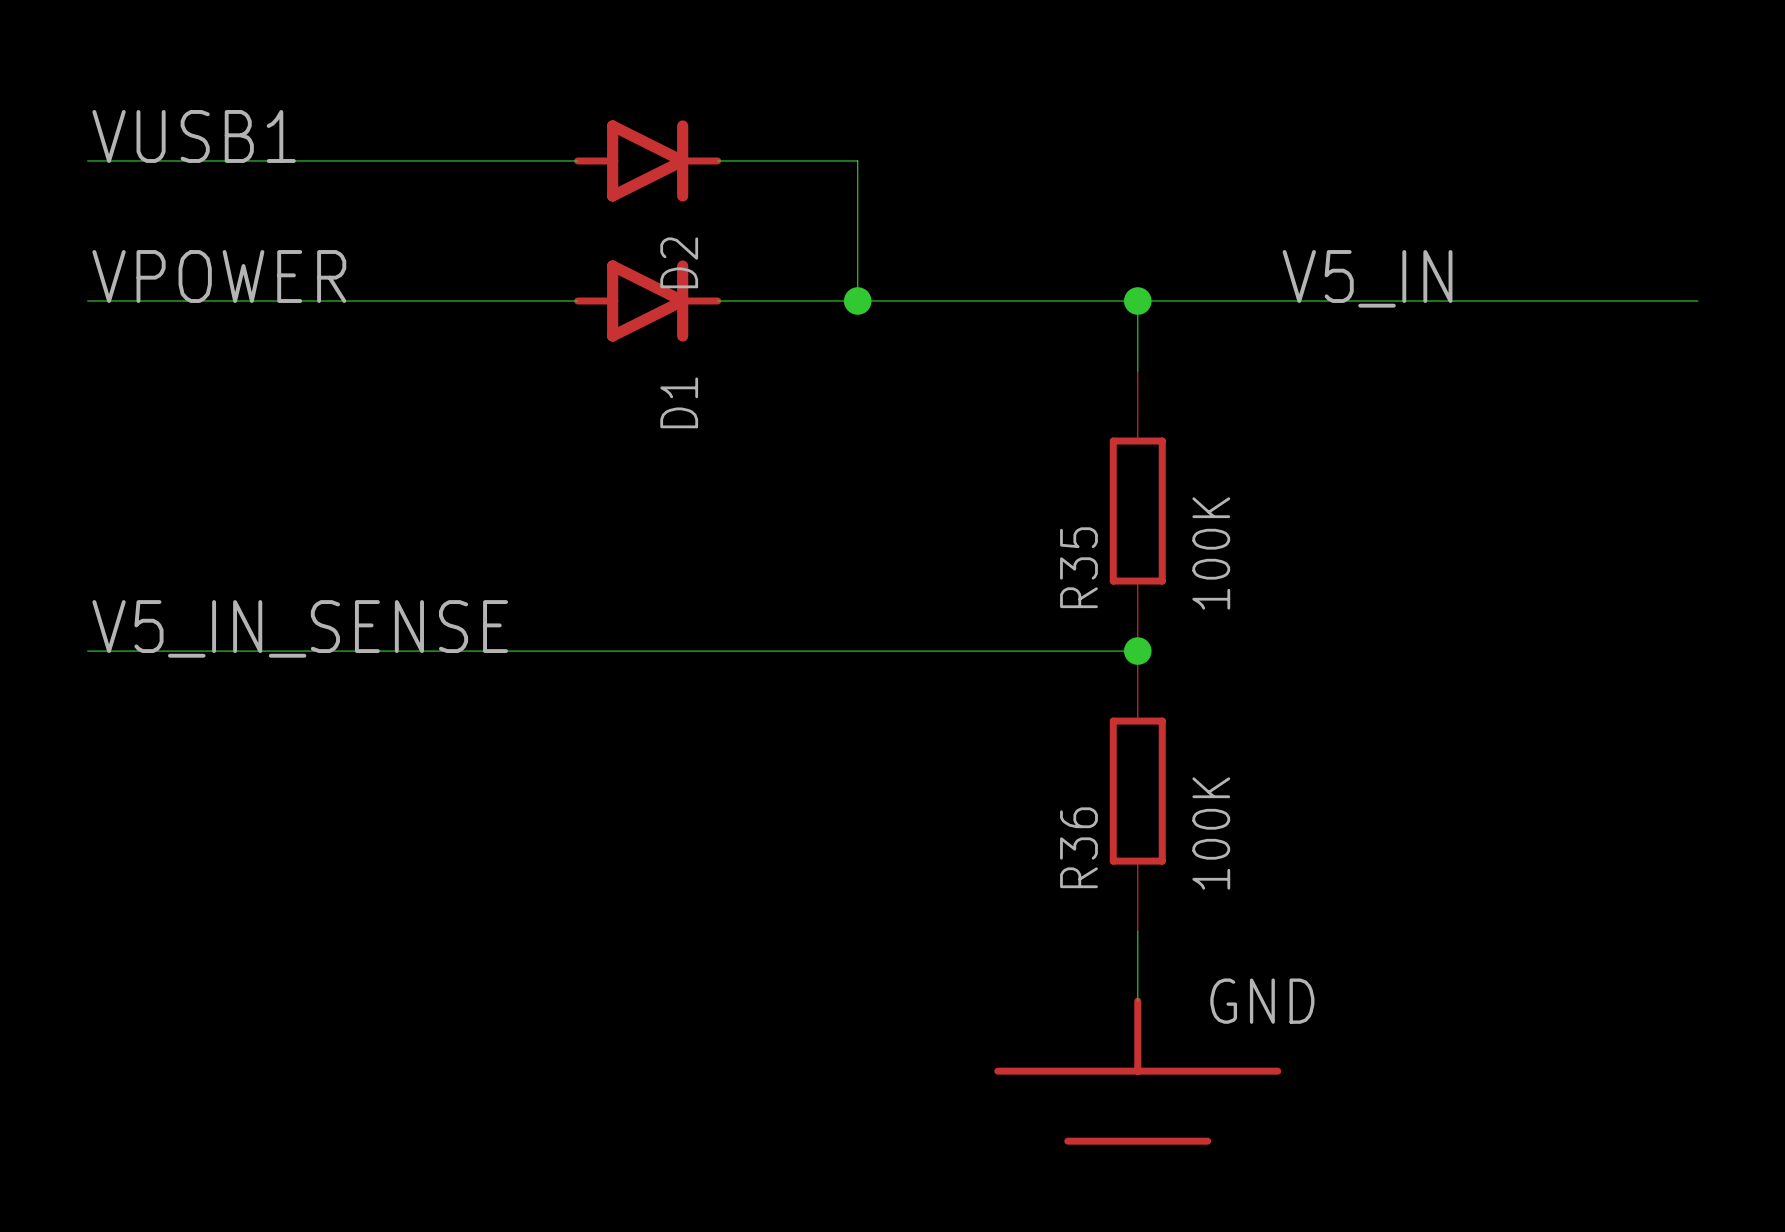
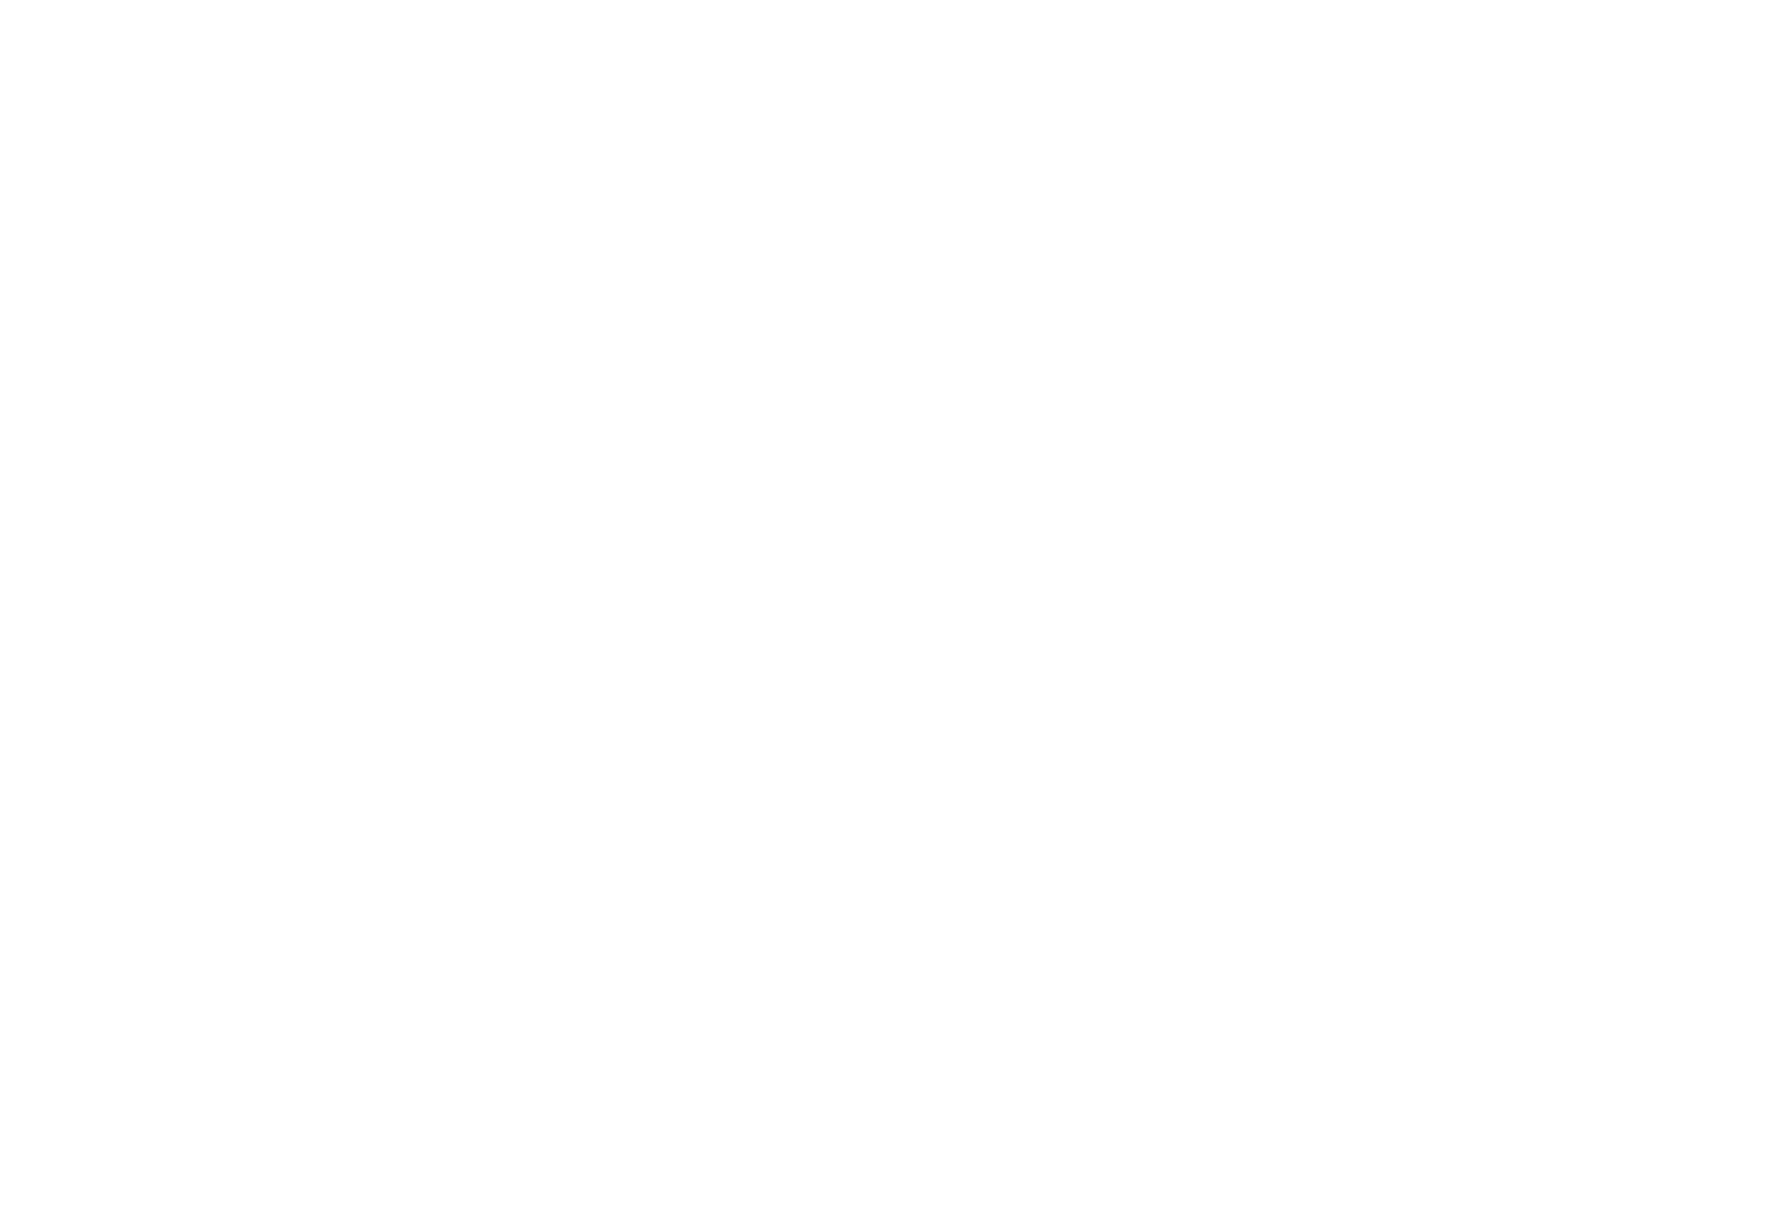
label: VUSB1 (194, 136) -> none
wire: (87, 160) (577, 160) -> none
D2: (647, 160) -> none
wire: (717, 160) (857, 160) (857, 301) -> none
label: VPOWER (219, 276) -> none
label: V5_IN (1367, 278) -> none
wire: (87, 301) (577, 301) -> none
D1: (647, 301) -> none
wire: (717, 301) (1697, 301) -> none
junction: (857, 301) -> none
wire: (1137, 301) (1137, 371) -> none
junction: (1137, 301) -> none
R35: 100K (1137, 511) -> none
label: V5_IN_SENSE (300, 628) -> none
wire: (87, 651) (1137, 651) -> none
junction: (1137, 651) -> none
R36: 100K (1137, 791) -> none
wire: (1137, 931) (1137, 1001) -> none
power symbol: (1137, 1071) -> none

